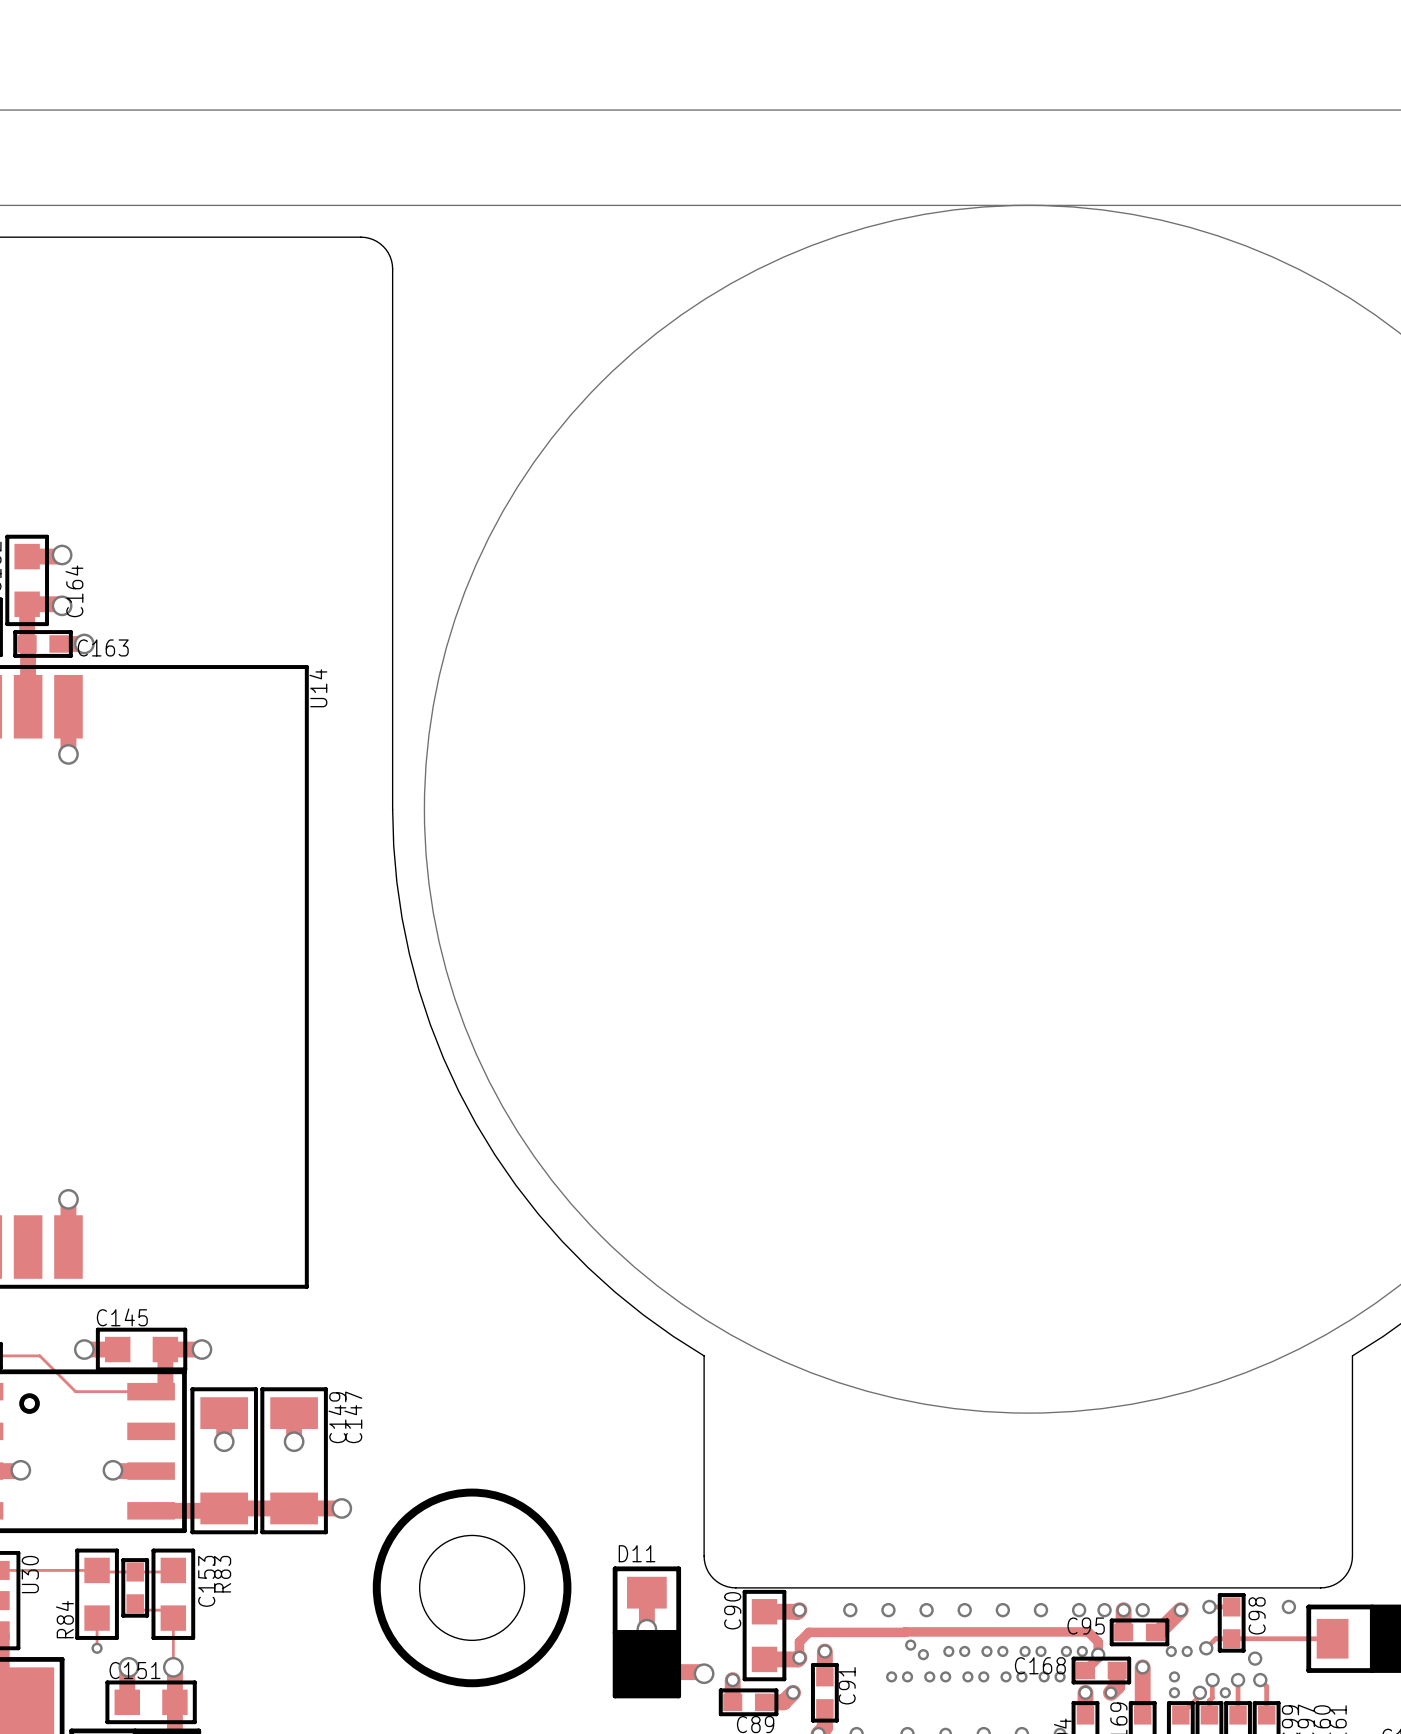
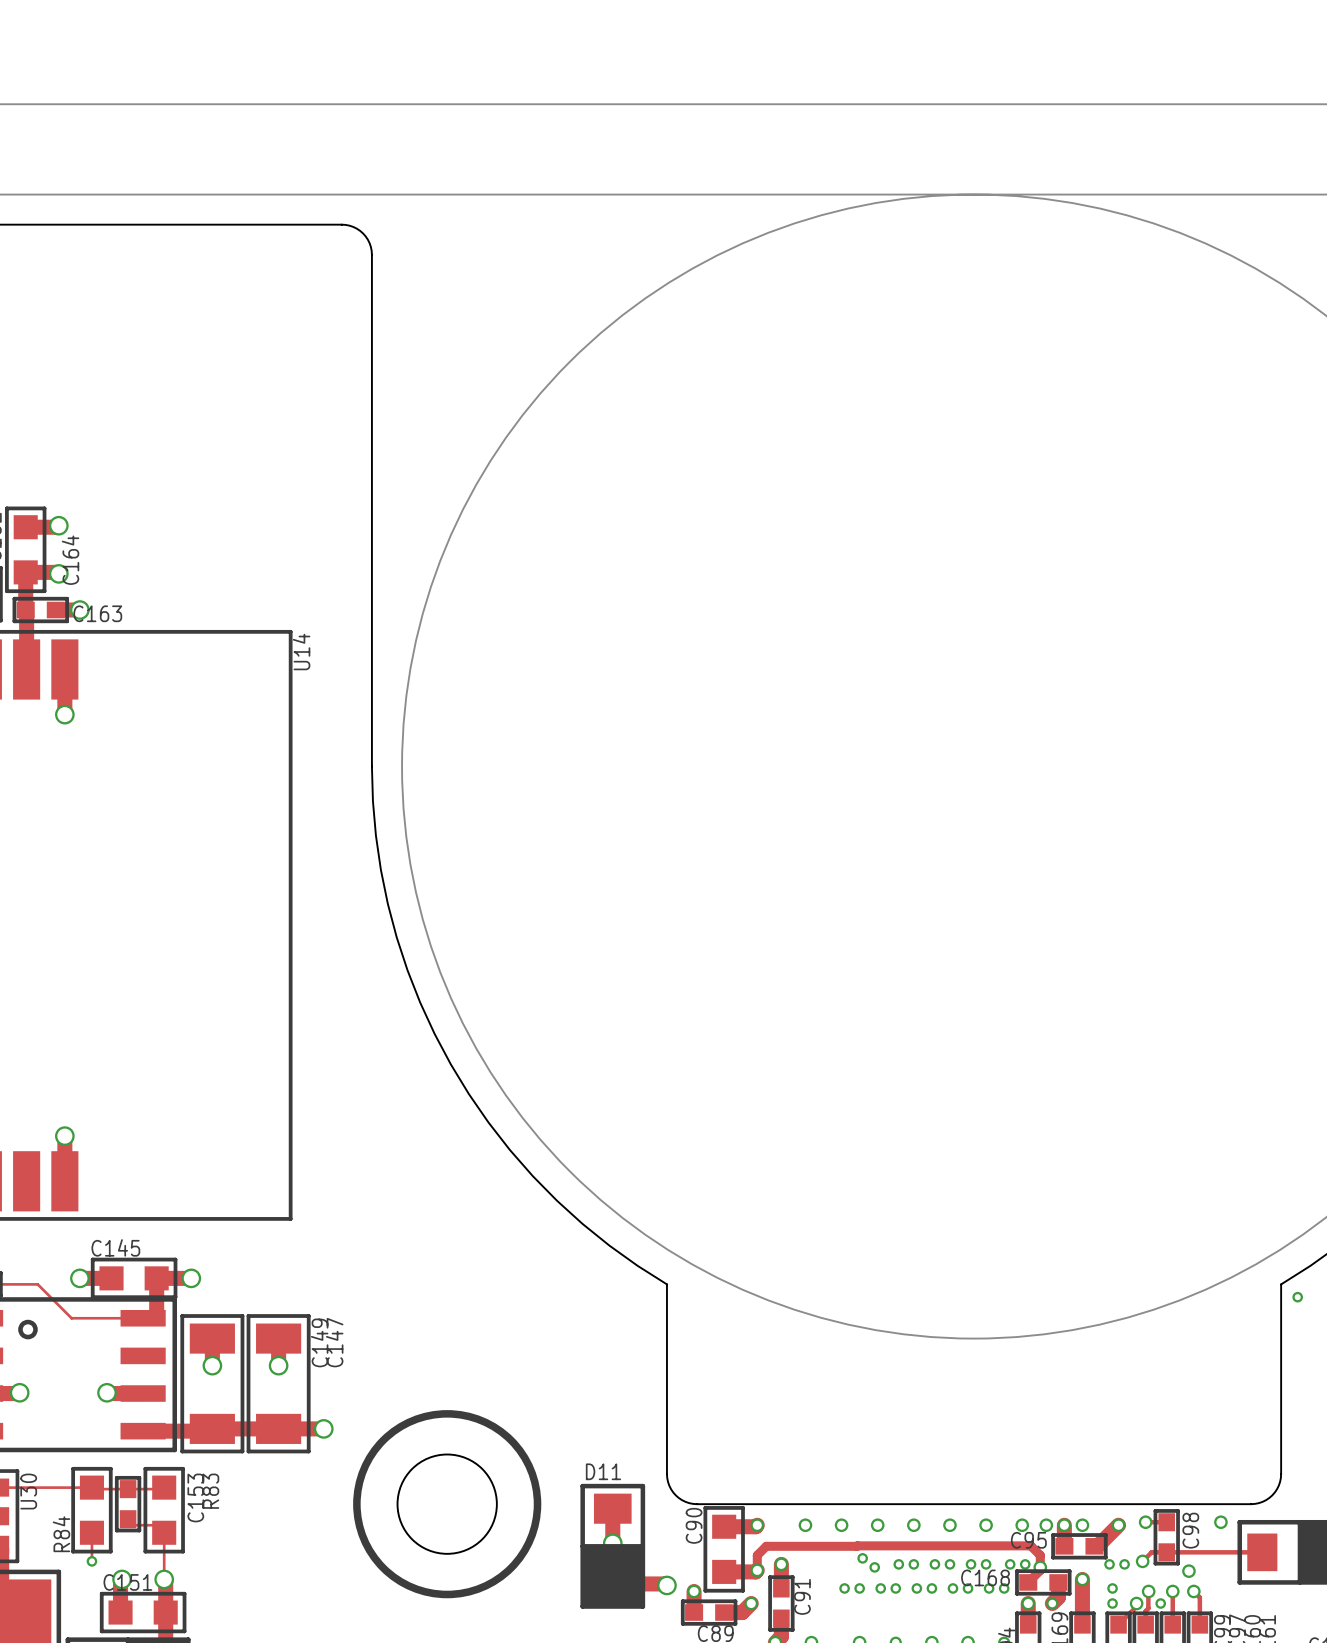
via: none -> (1297, 1297)

